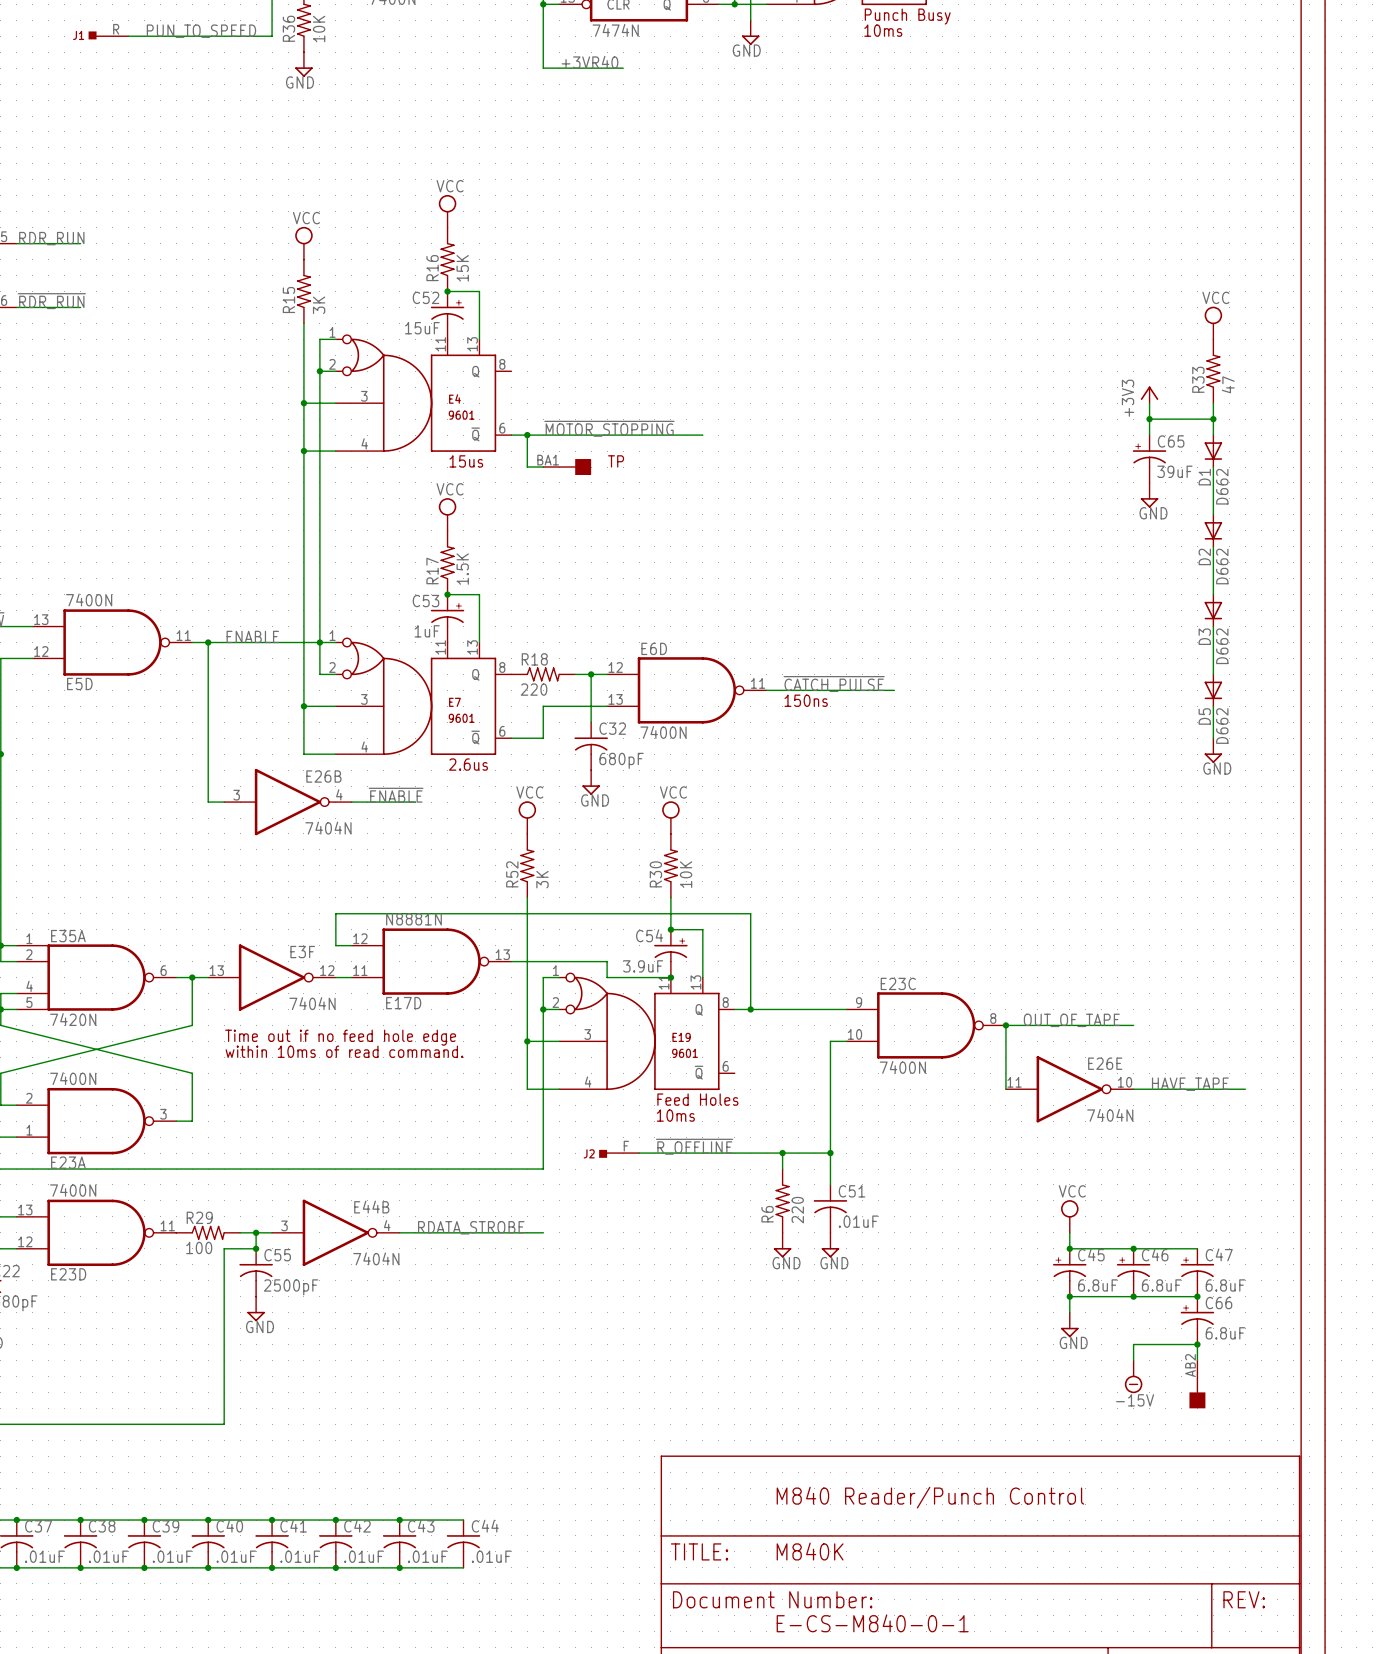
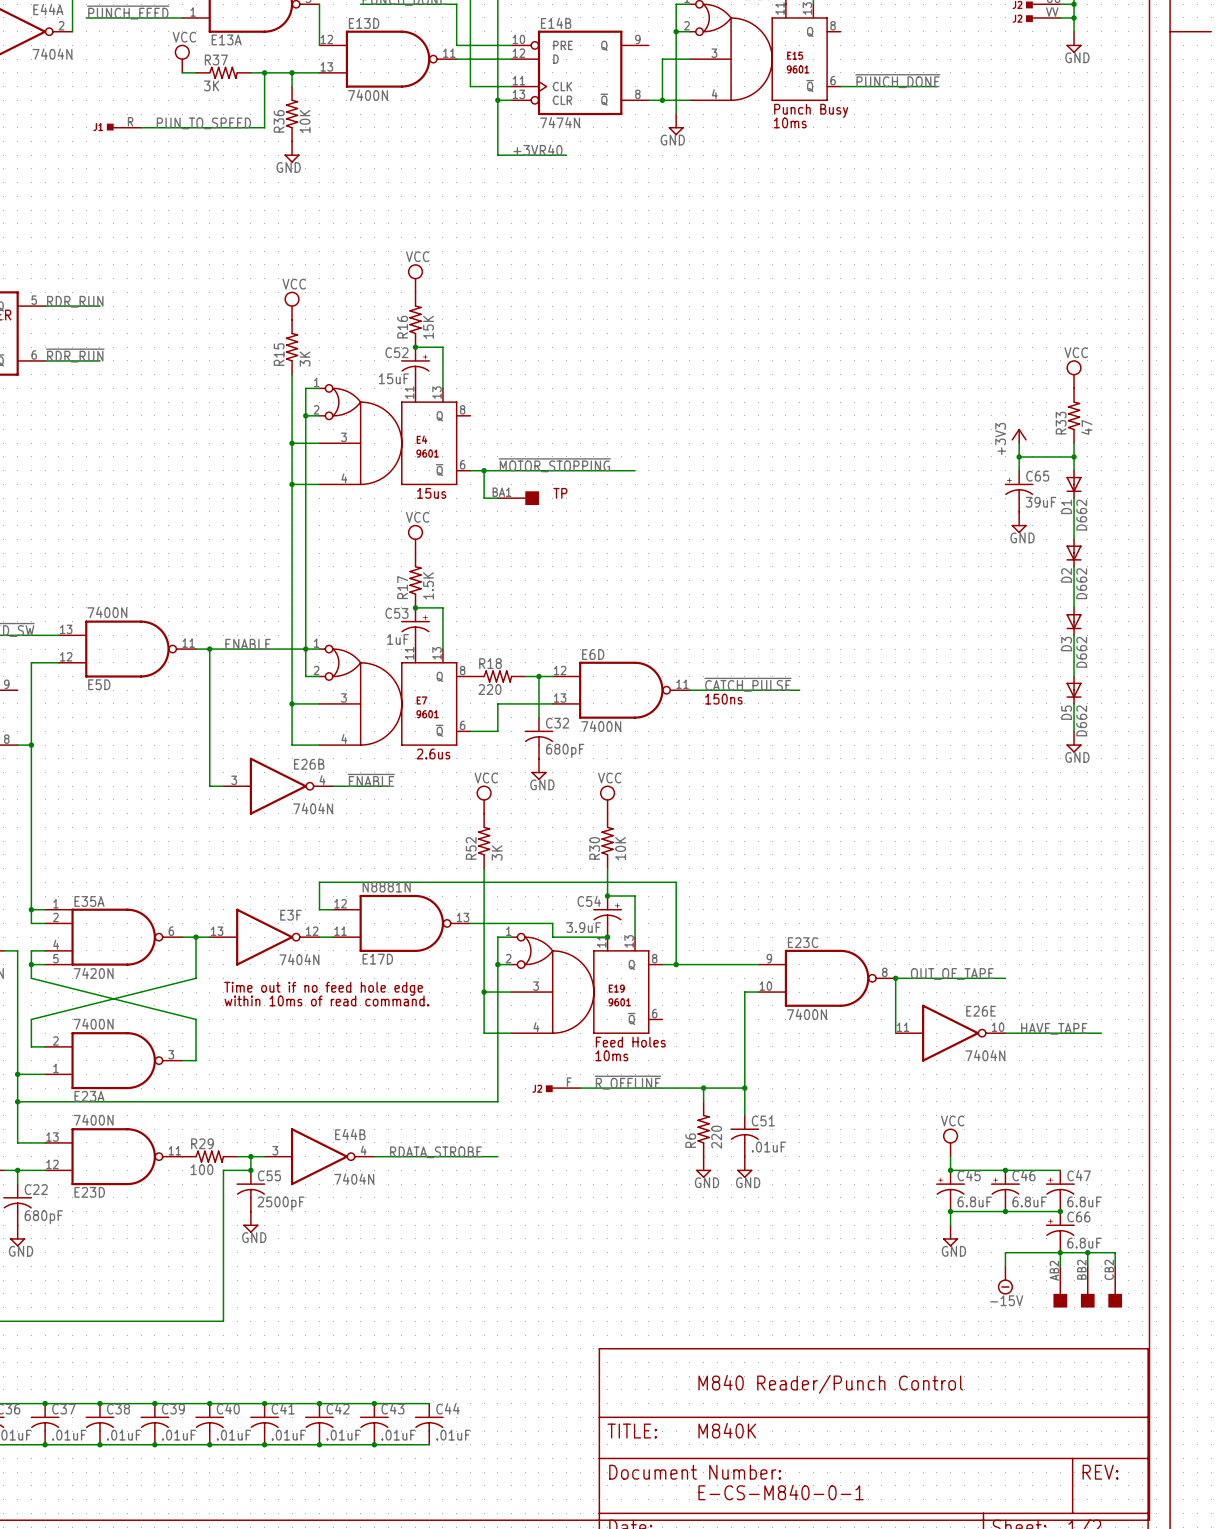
wire: none -> (1060, 1252) (1115, 1252) (1115, 1266)
wire: none -> (1087, 1252) (1087, 1266)
junction: none -> (1087, 1252)
part: none -> (1087, 1286)
part: none -> (1115, 1286)

